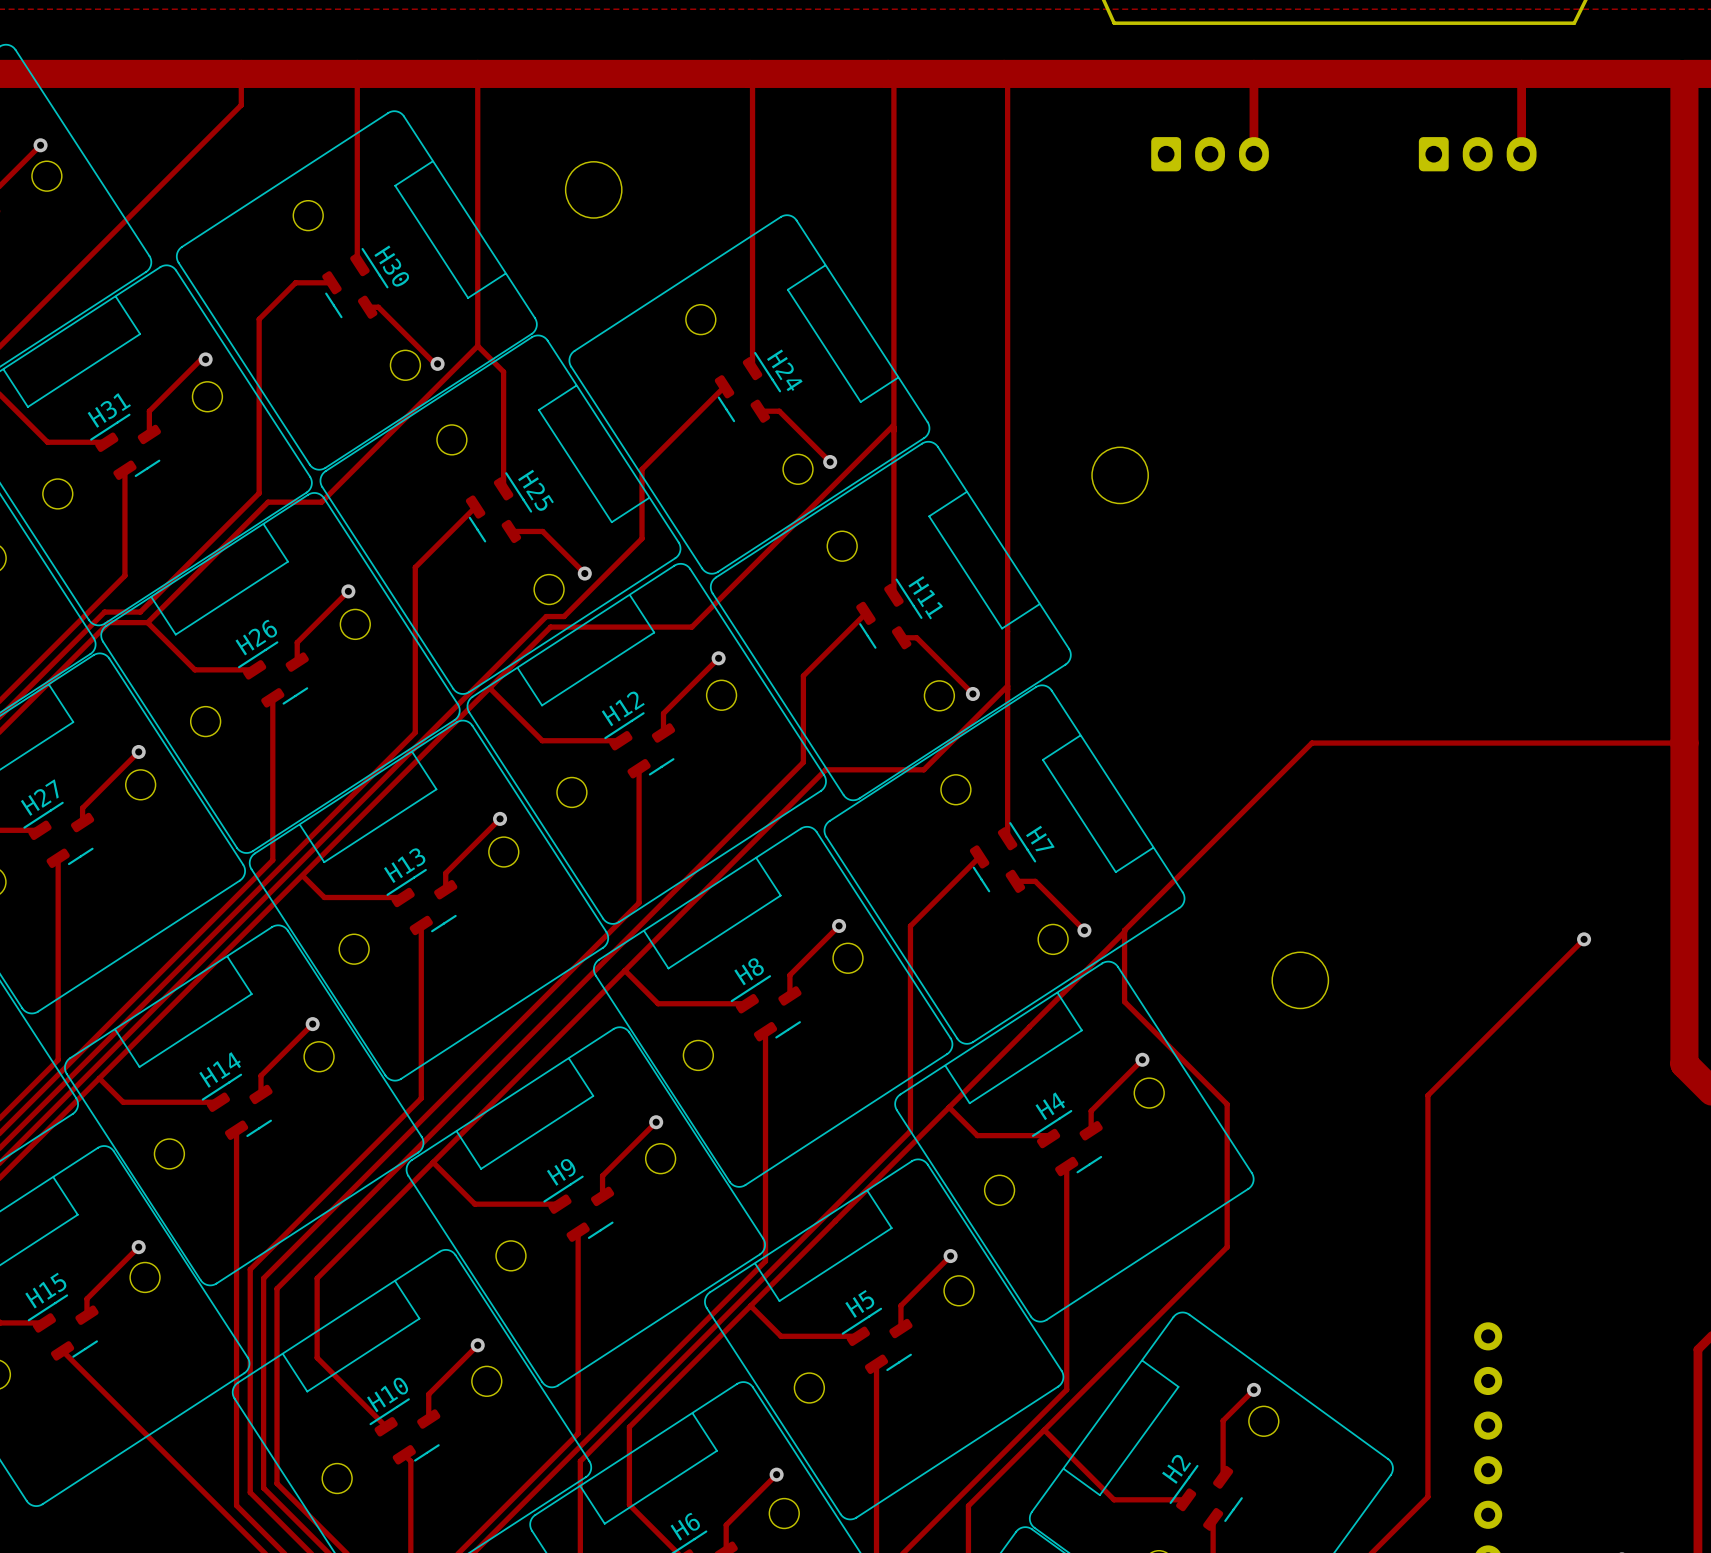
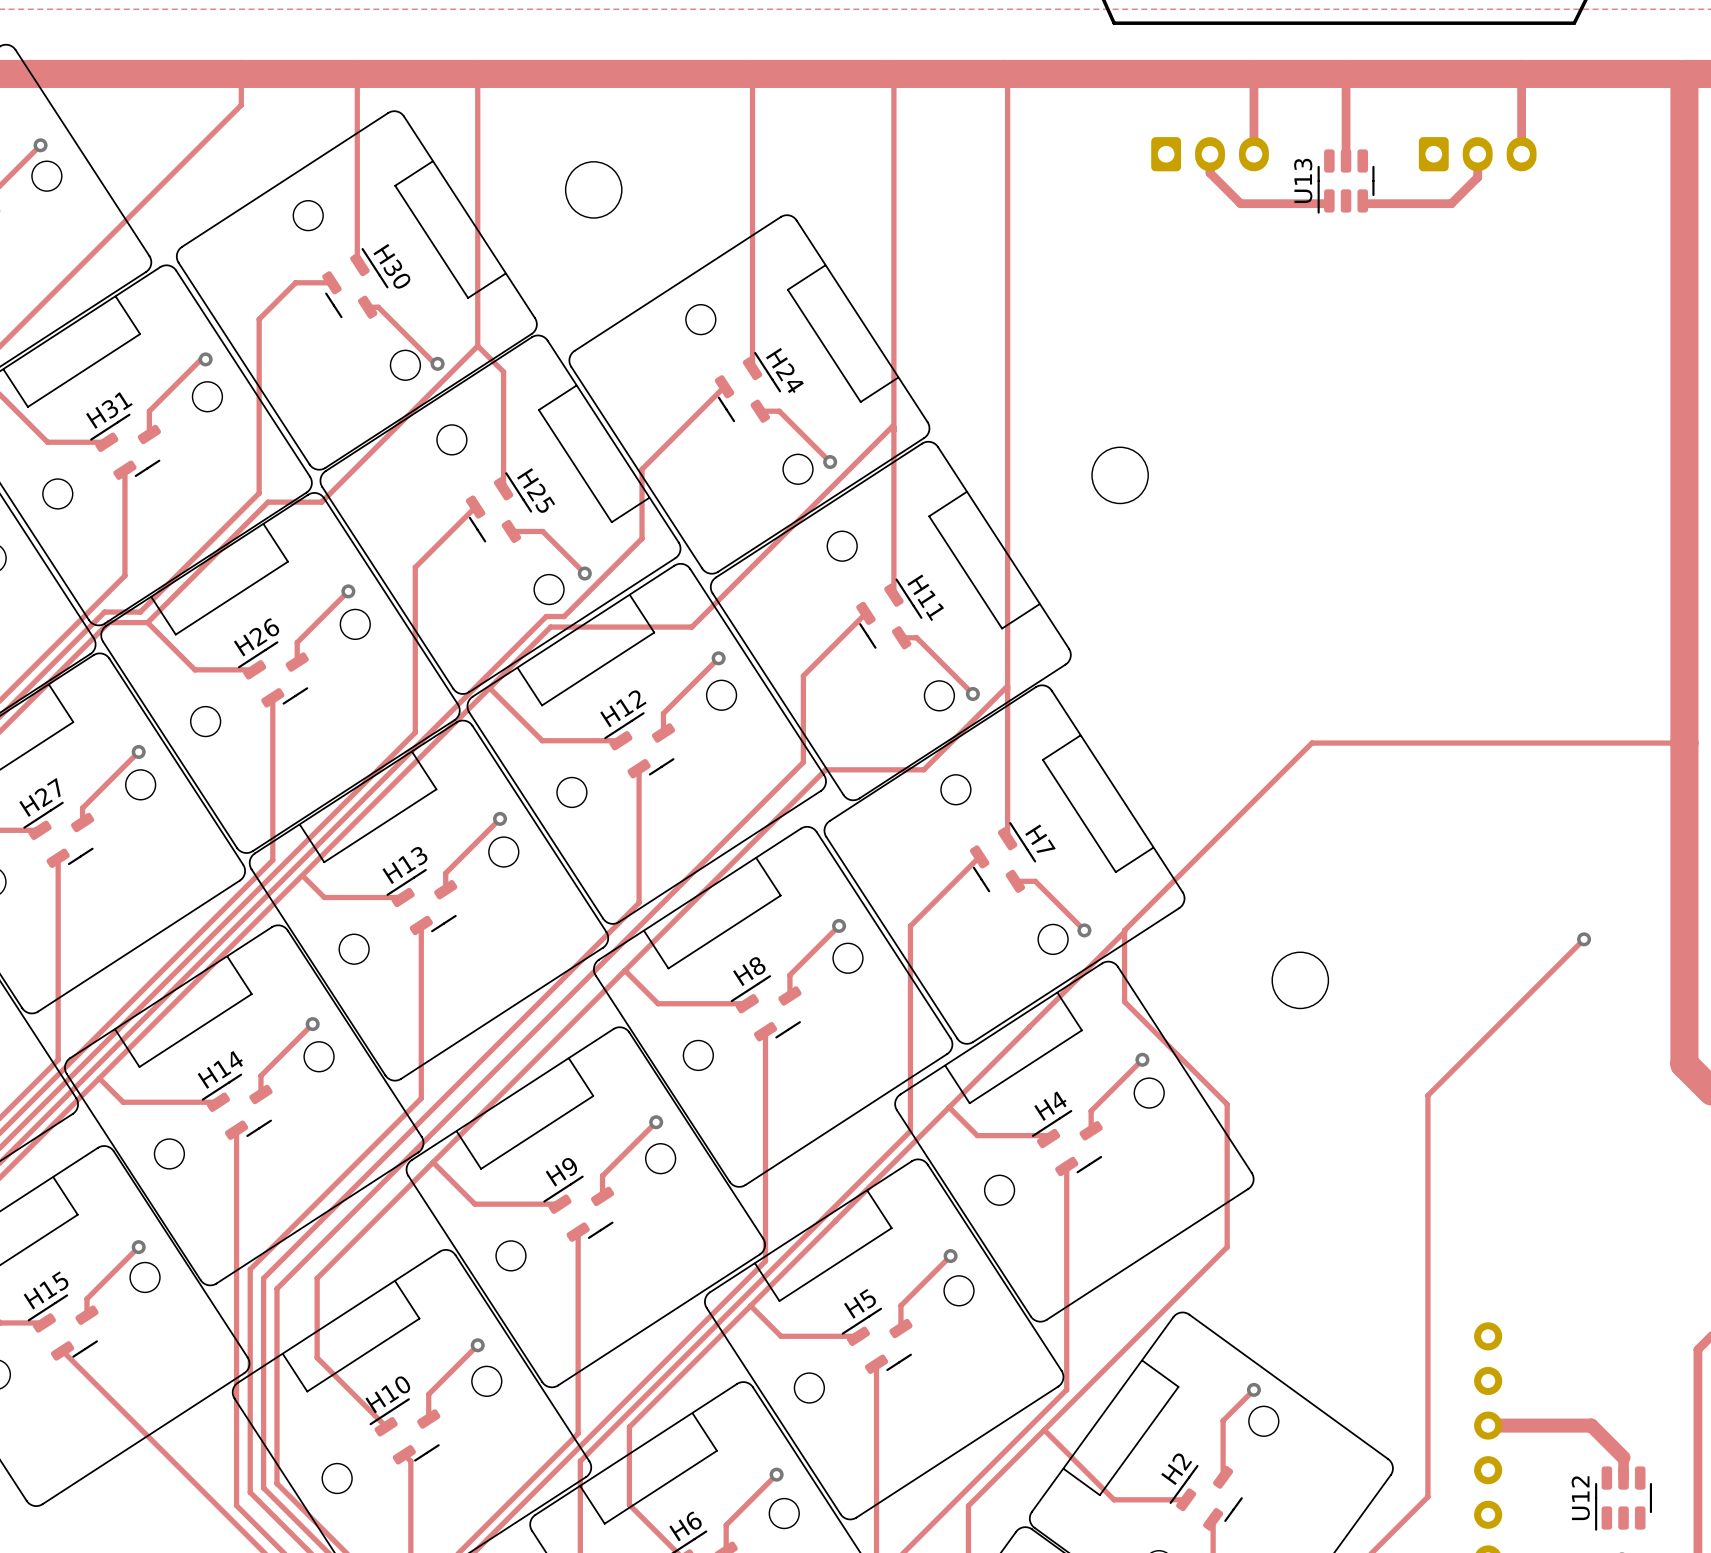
track: none -> (1346, 73) (1346, 161)
track: none -> (1210, 154) (1210, 173) (1240, 203) (1326, 203) (1329, 200)
track: none -> (1477, 154) (1477, 177) (1451, 203) (1365, 203) (1362, 200)
U13: none -> (1346, 181)
track: none -> (1488, 1425) (1591, 1425) (1623, 1457) (1623, 1478)
U12: none -> (1623, 1498)

